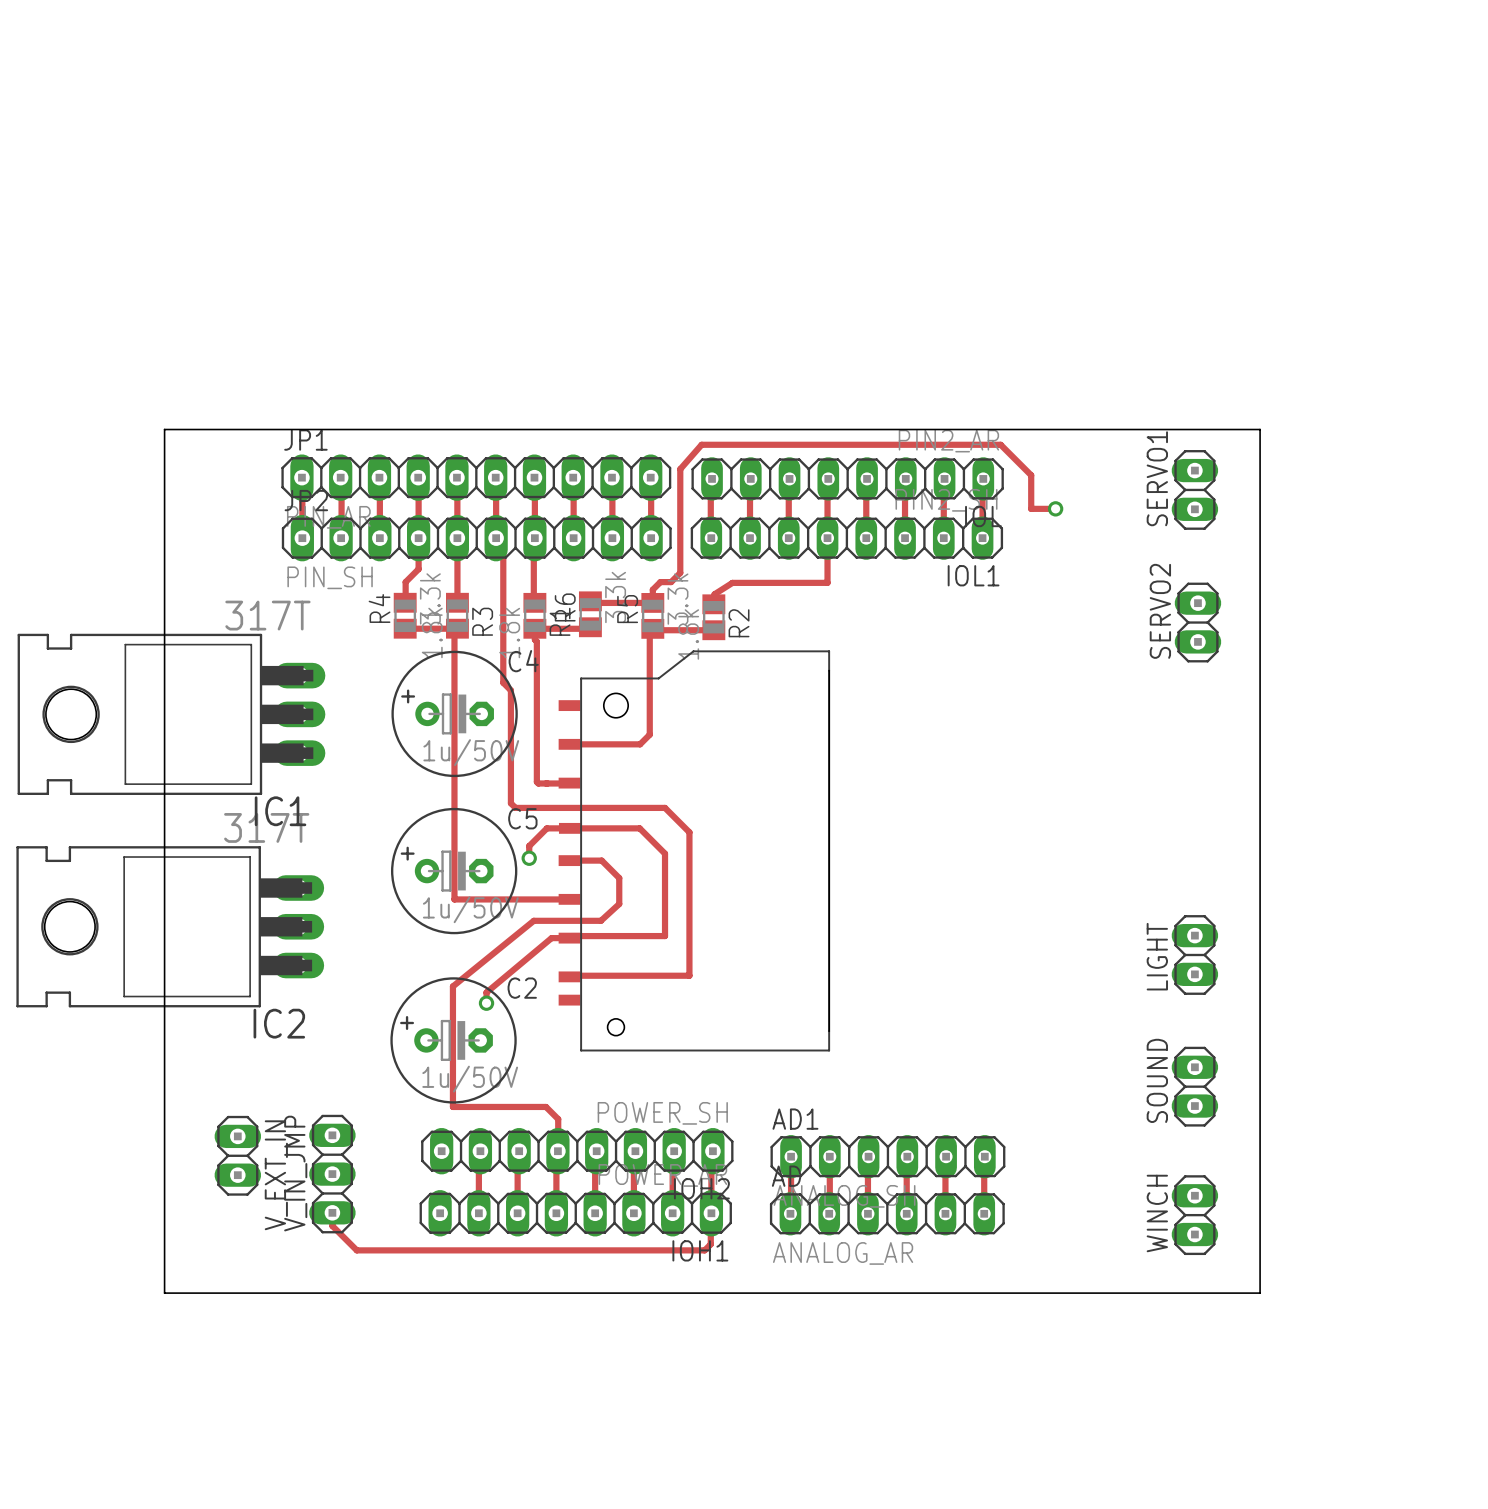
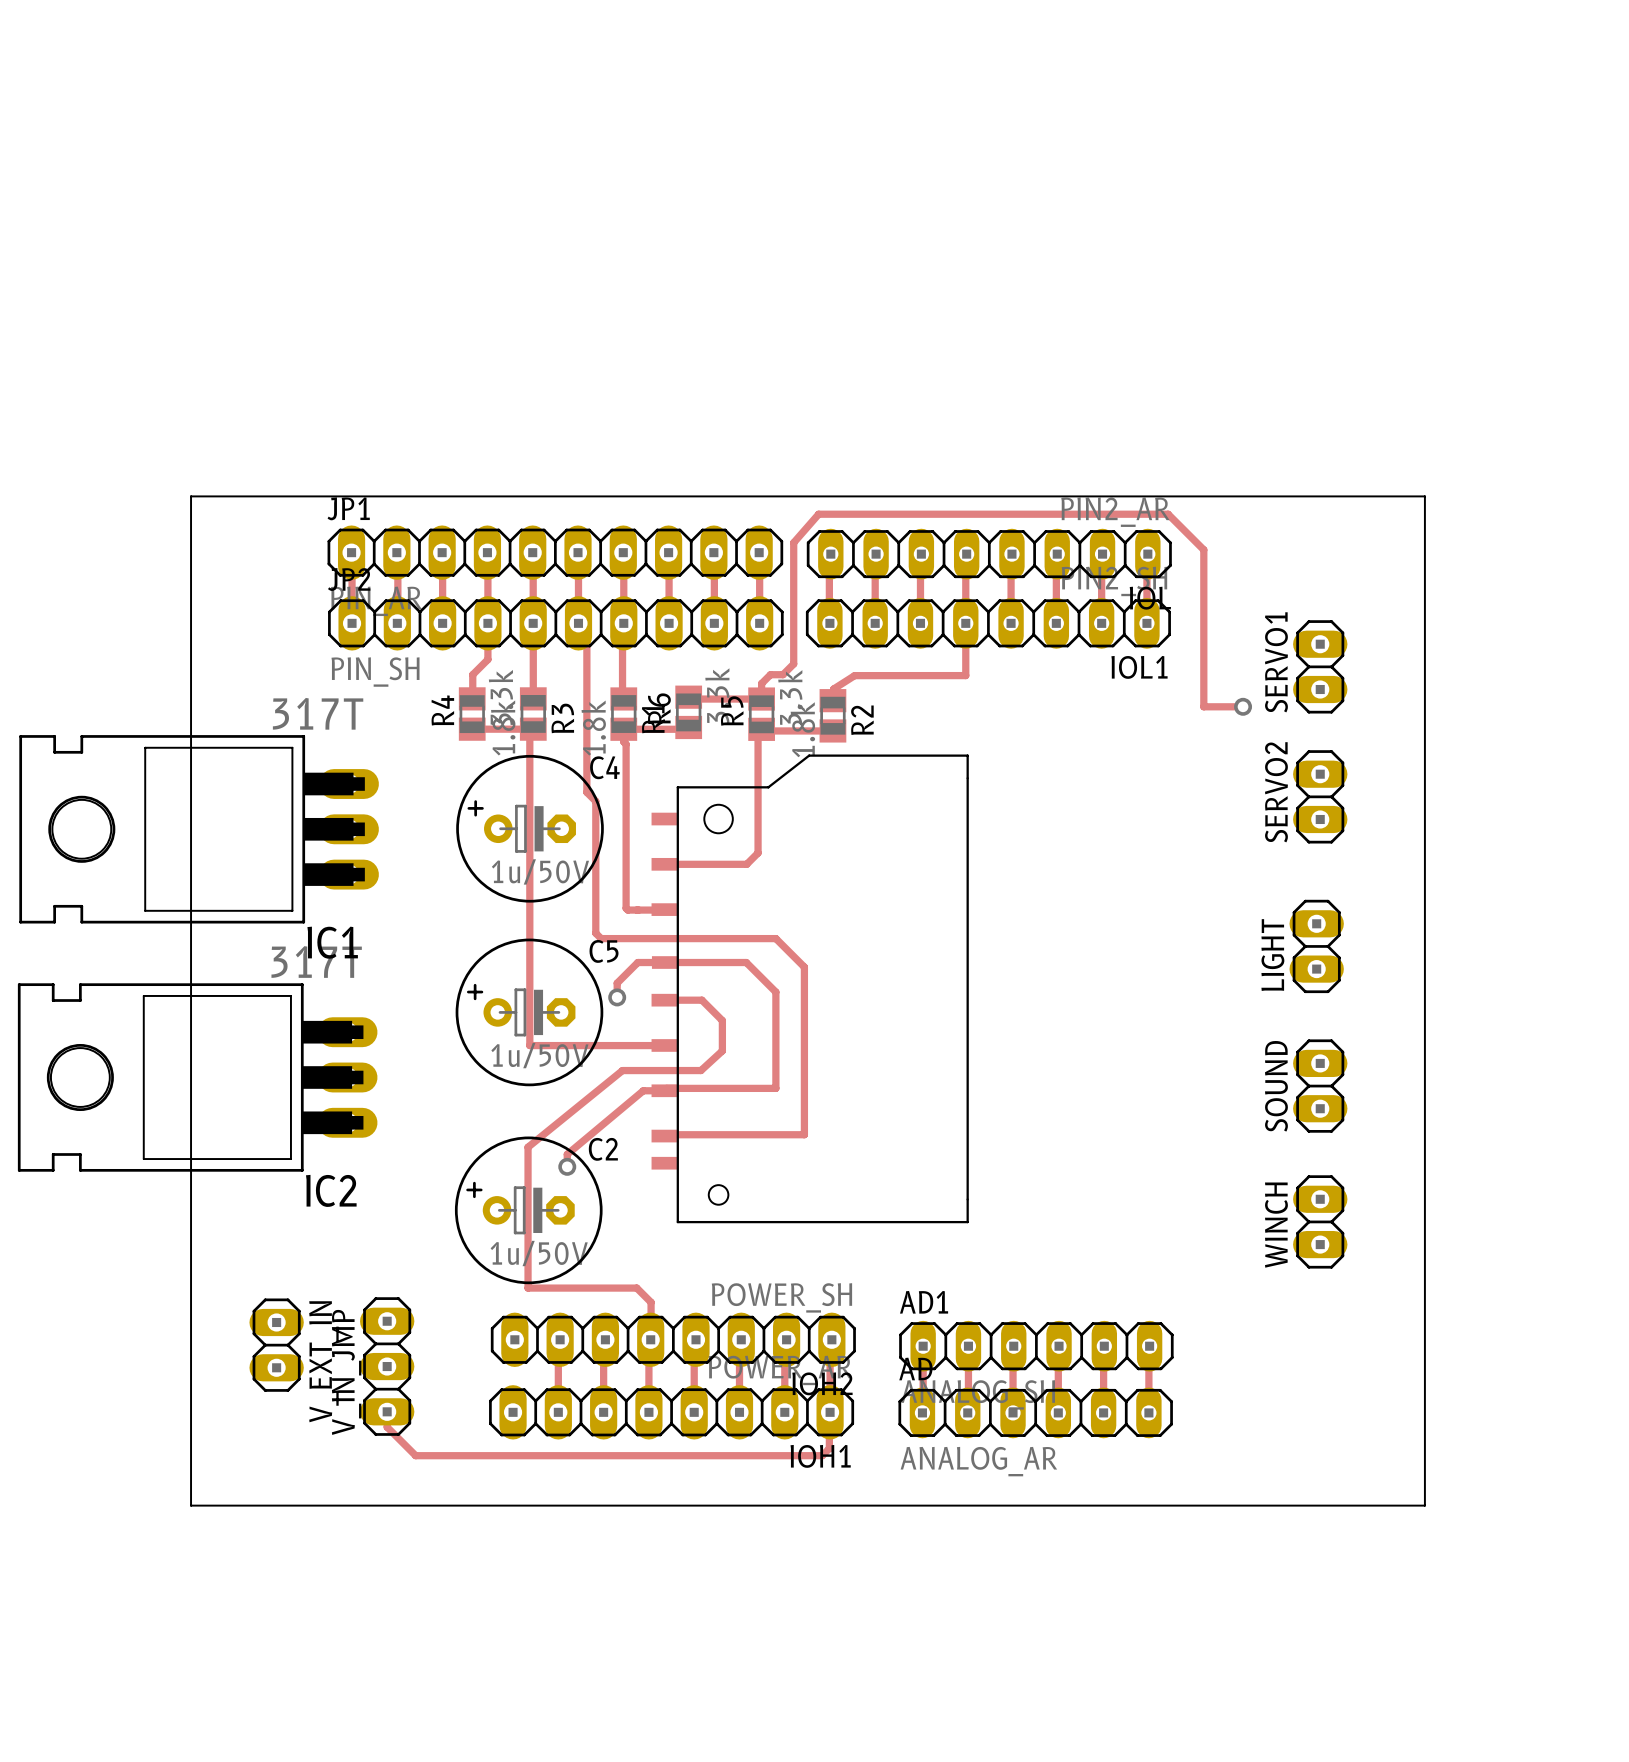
board edge: (1220, 429) (1260, 429) (1260, 1293) (1220, 1293) -> (1424, 496) (1424, 1505)
SERVO1 position: (1194, 489) -> (1320, 666)
track: (1031, 508) (1055, 508) -> (1203, 589) (1203, 706) (1243, 706)
via: (1055, 508) -> none
via: none -> (1243, 706)
SERVO2 position: (1197, 622) -> (1320, 796)
LIGHT position: (1194, 954) -> (1316, 946)
SOUND position: (1194, 1086) -> (1320, 1086)
WINCH position: (1194, 1215) -> (1320, 1221)

